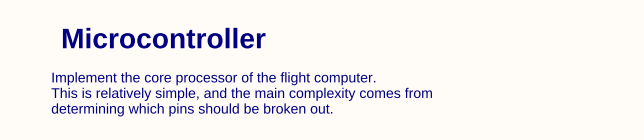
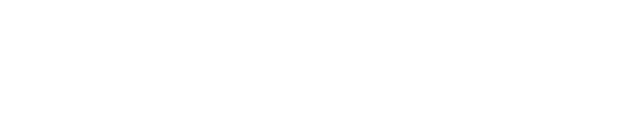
text: Microcontroller (164, 38) -> none
text: Implement the core processor of the flight computer. (213, 78) -> none
text: This is relatively simple, and the main complexity comes from (241, 94) -> none
text: determining which pins should be broken out. (192, 109) -> none

